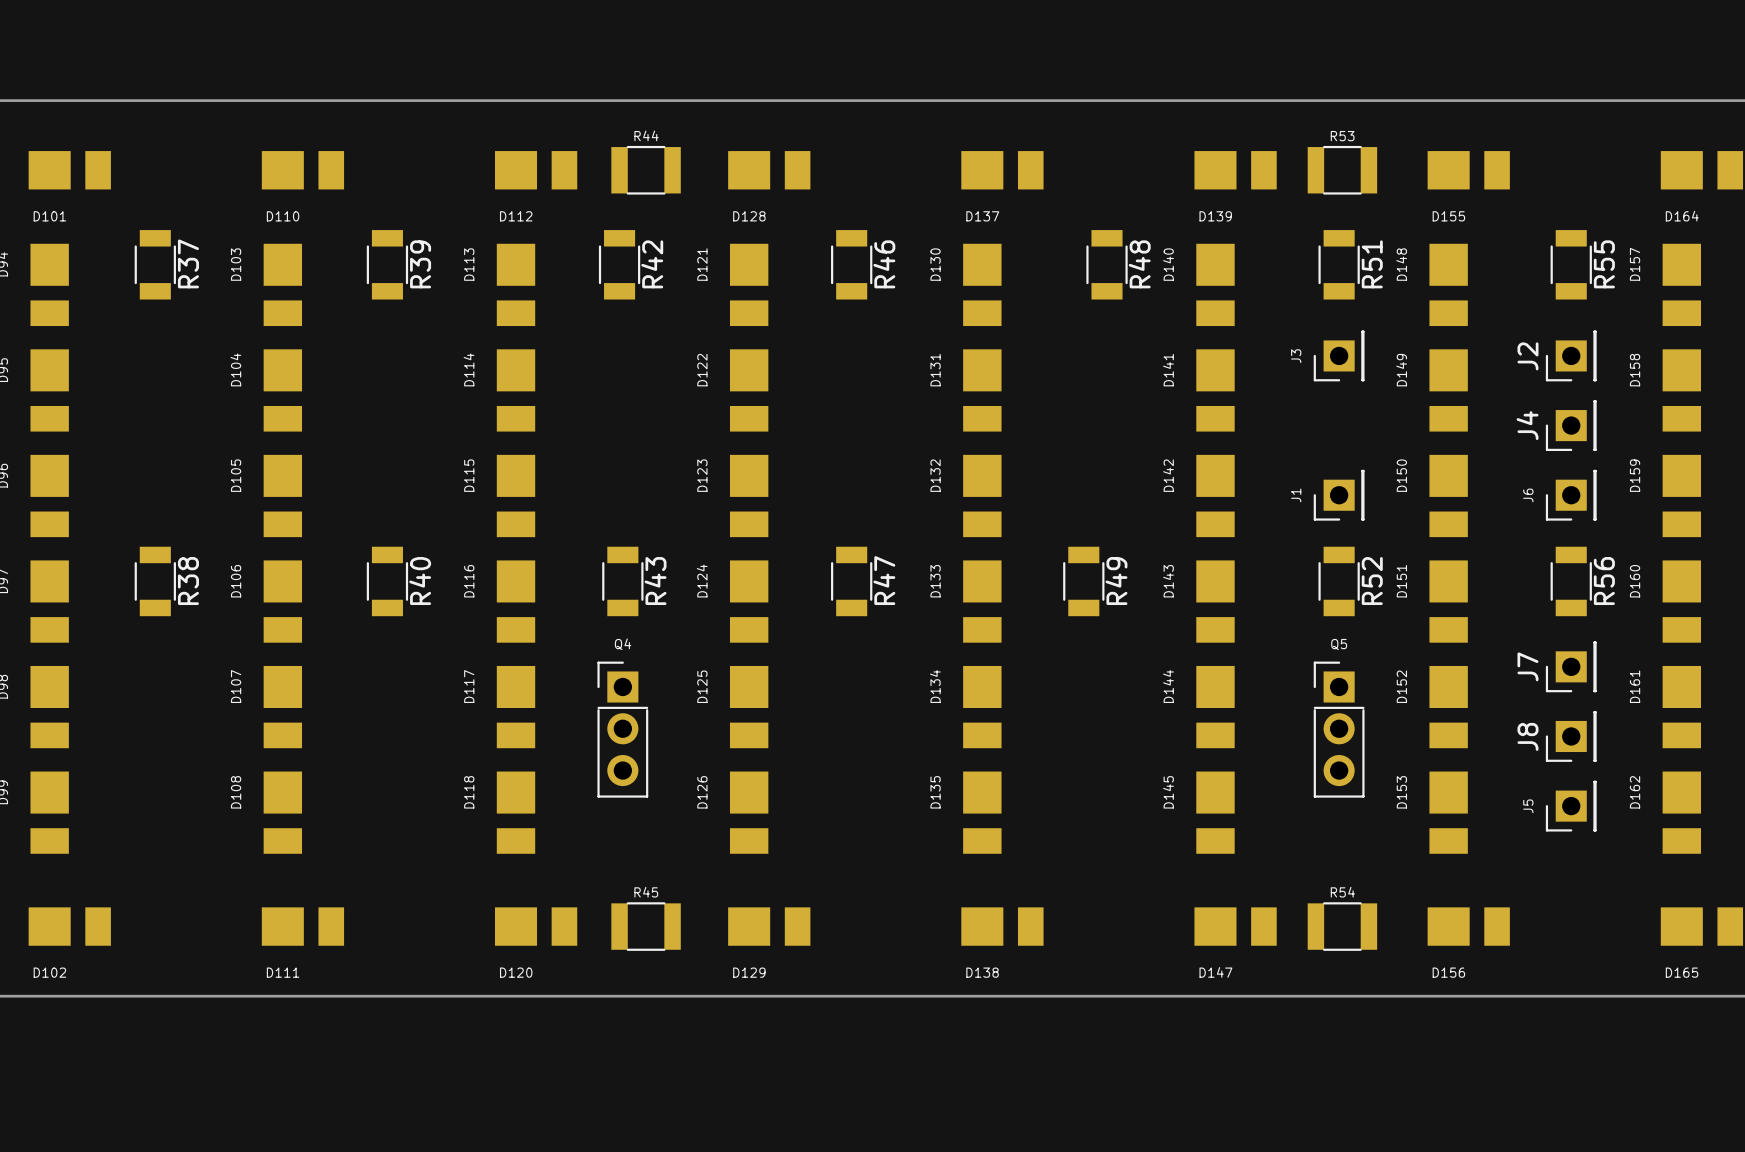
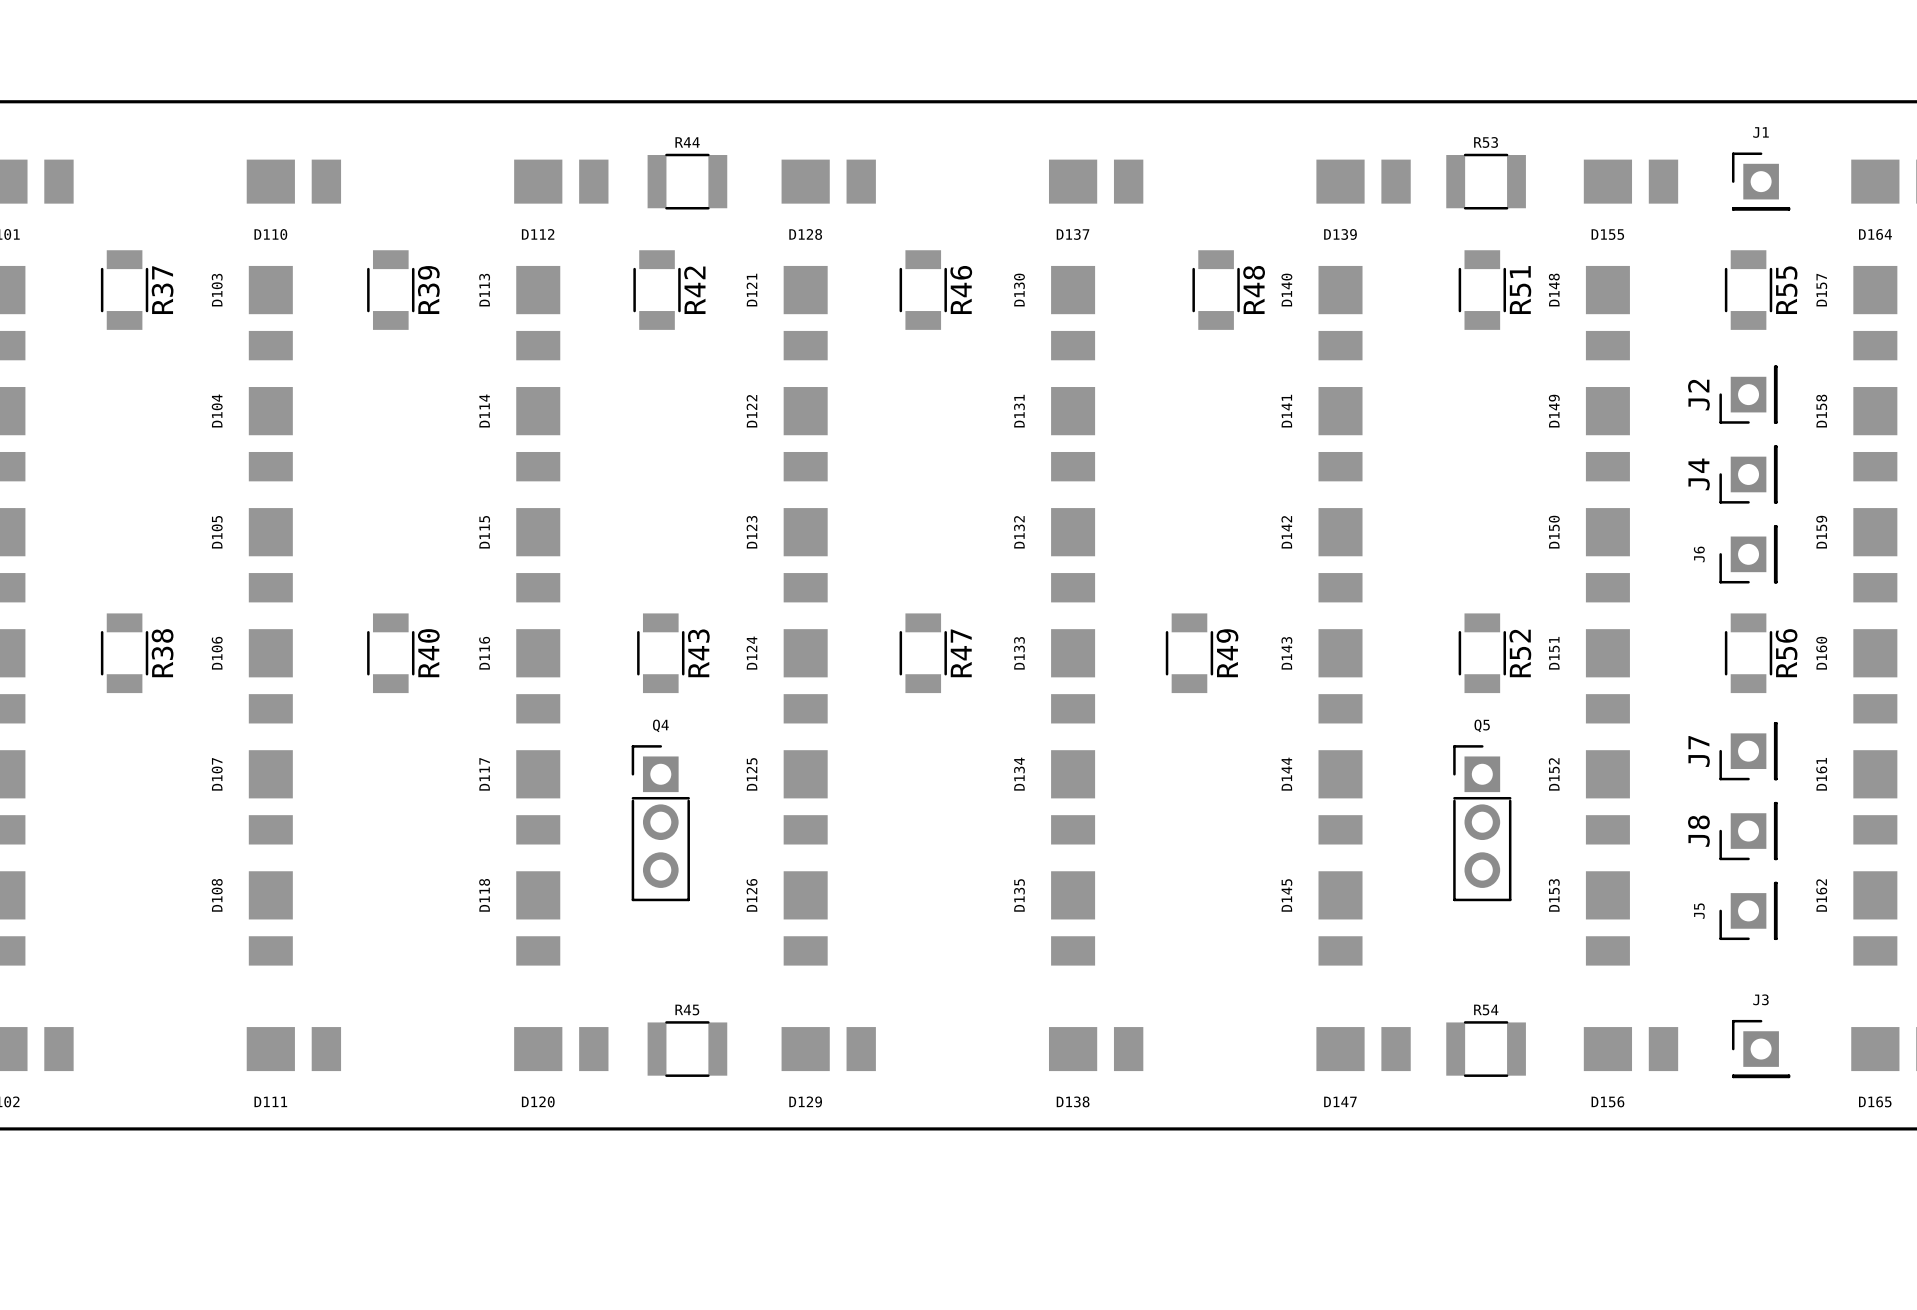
J3 rotation: 0° (1339, 355) -> 90° clockwise (1761, 1049)
J3 position: (1339, 355) -> (1761, 1049)
J1 rotation: 0° (1339, 495) -> 90° clockwise (1761, 181)
J1 position: (1339, 495) -> (1761, 181)

